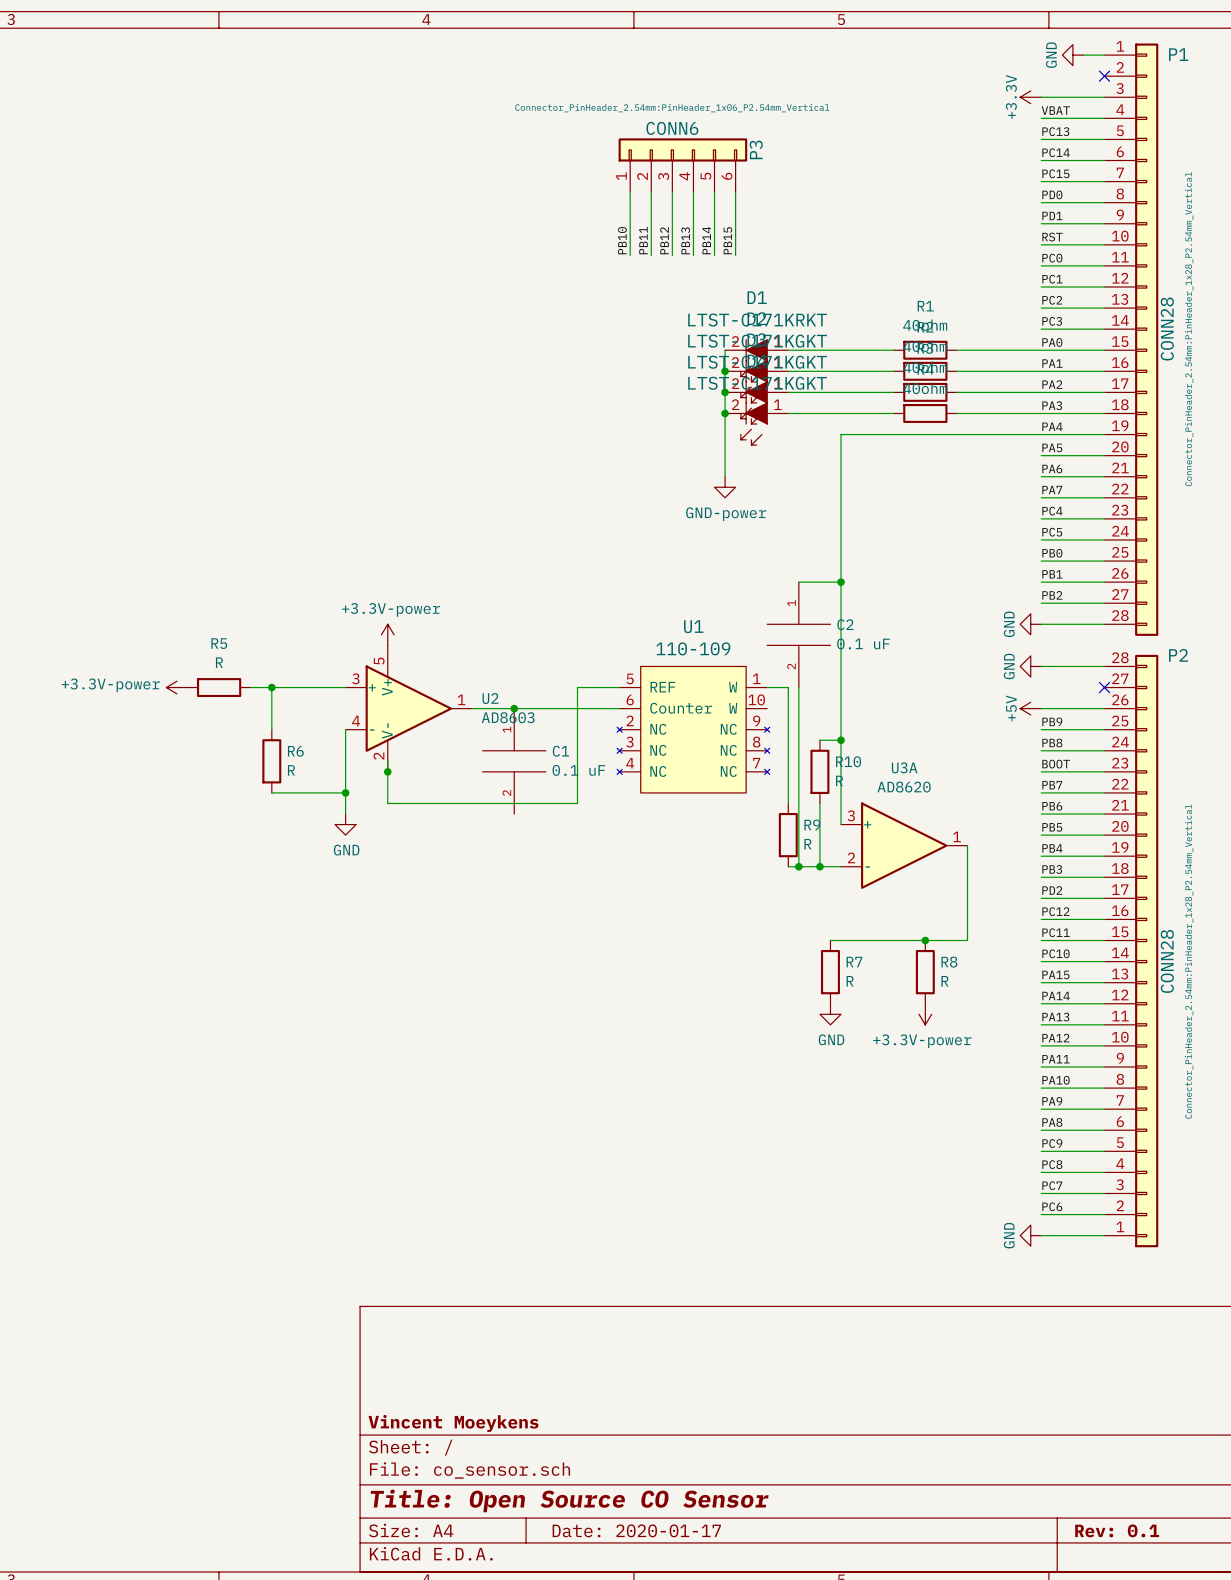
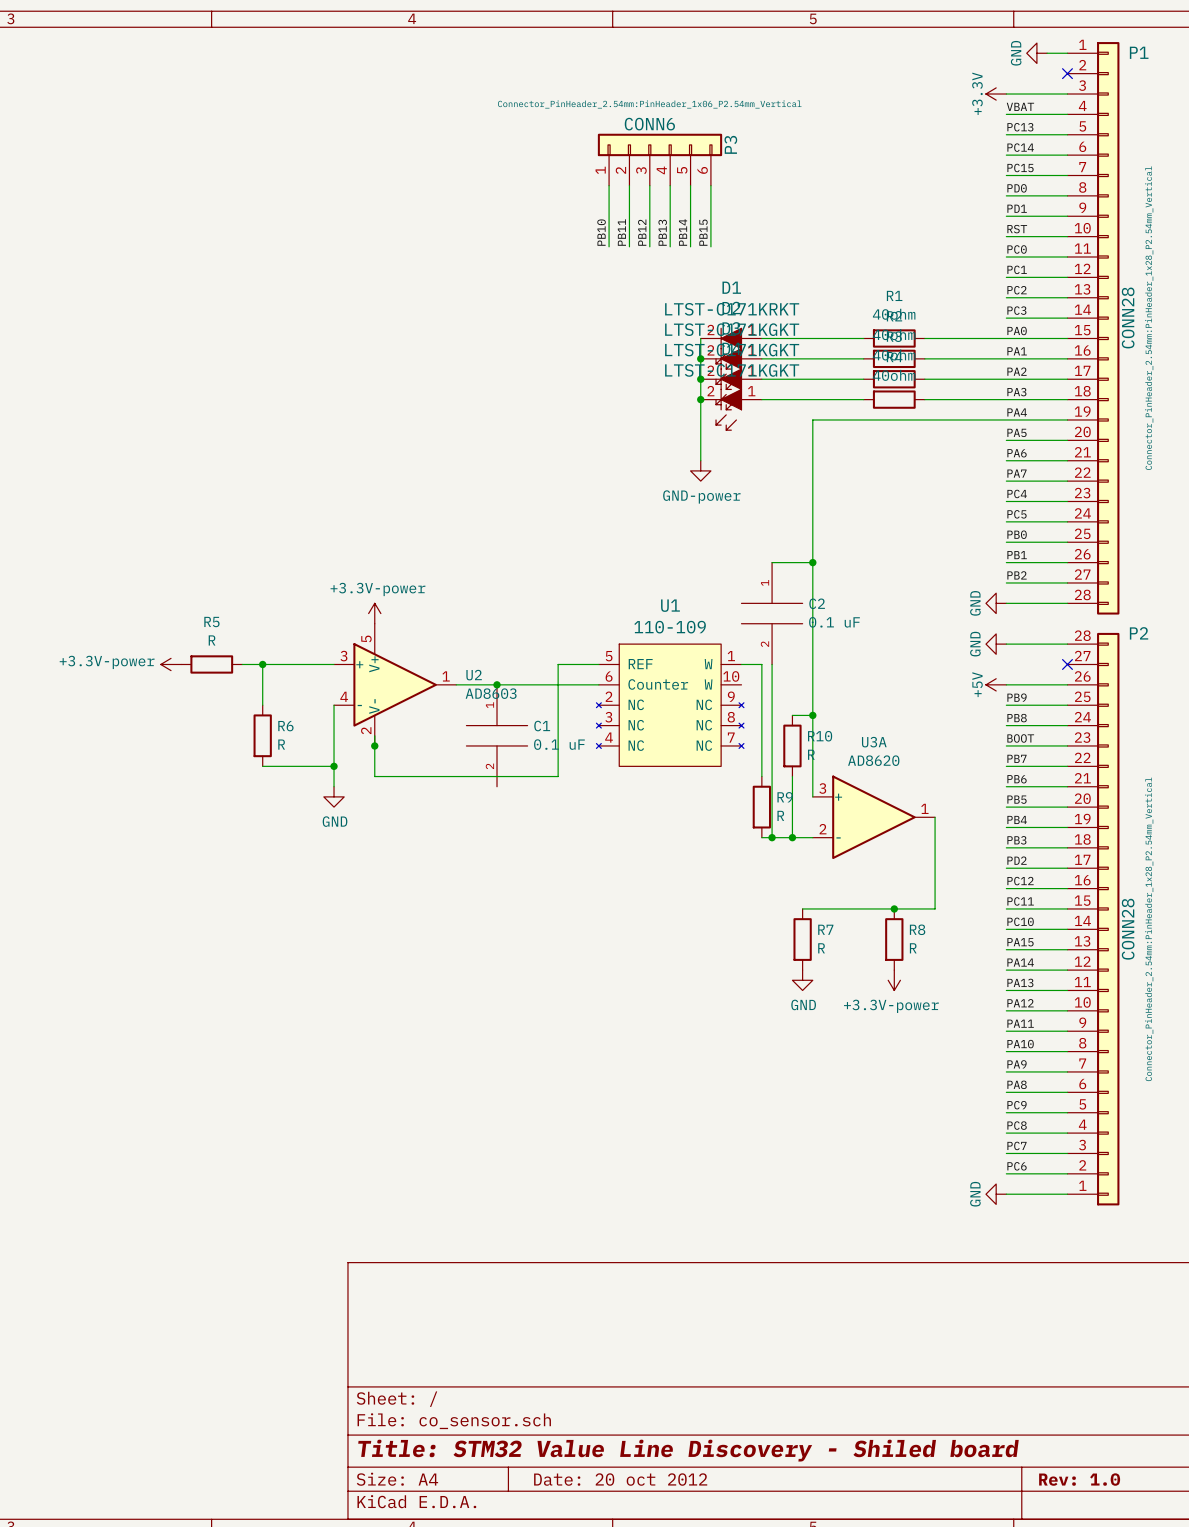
title block: Vincent Moeykens (453, 1423) -> none
title block: Title: Open Source CO Sensor (569, 1500) -> Title: STM32 Value Line Discovery - Shiled board (688, 1450)
title block: Date: 2020-01-17 (636, 1530) -> Date: 20 oct 2012 (620, 1479)
title block: Rev: 0.1 (1117, 1530) -> Rev: 1.0 (1079, 1479)

